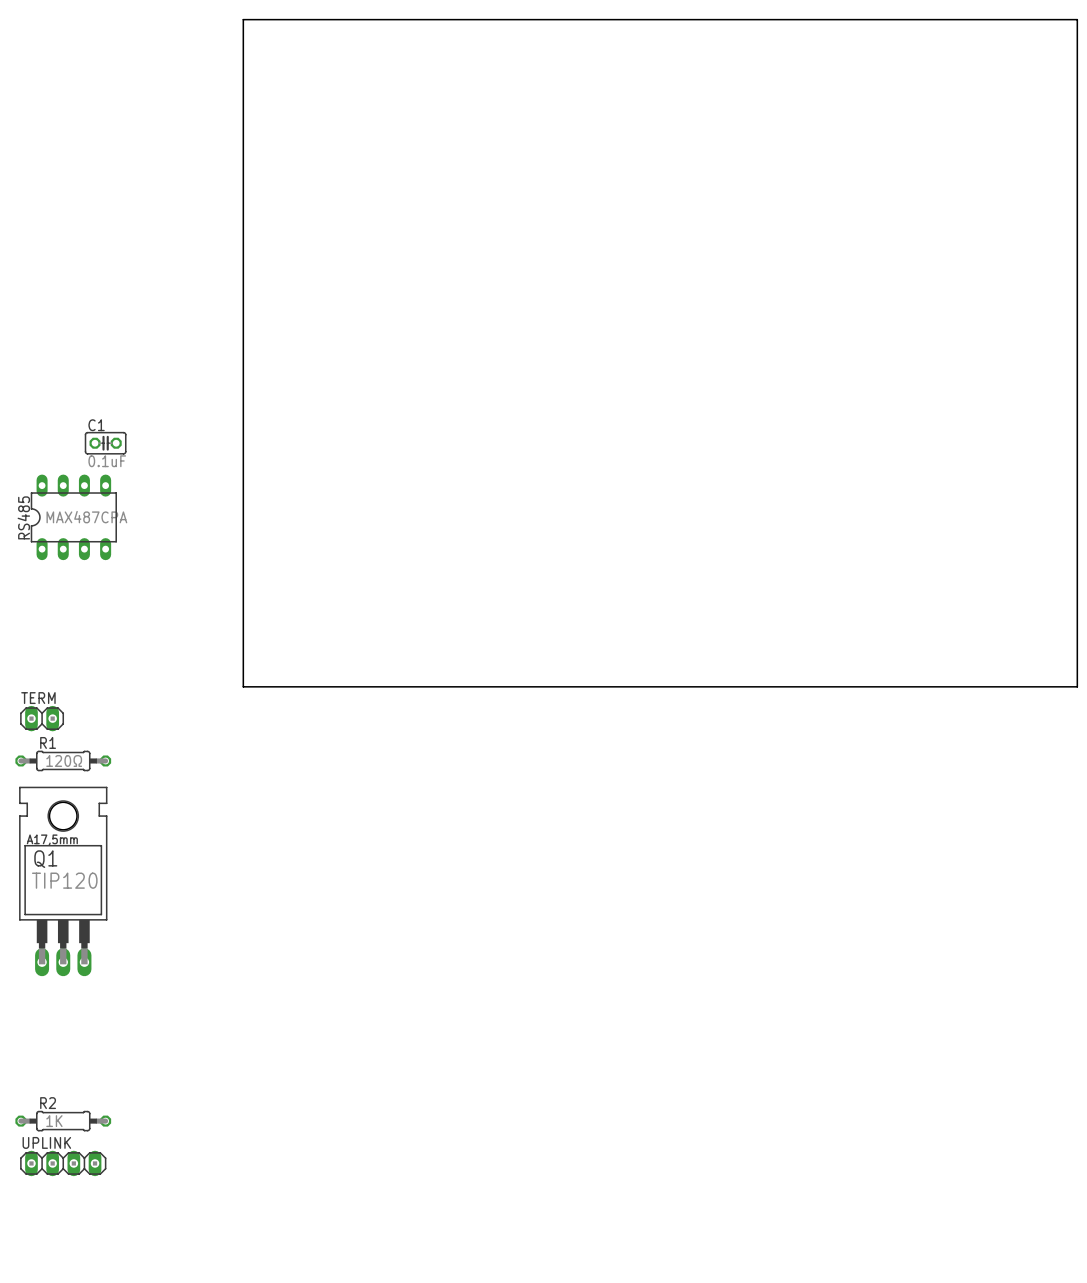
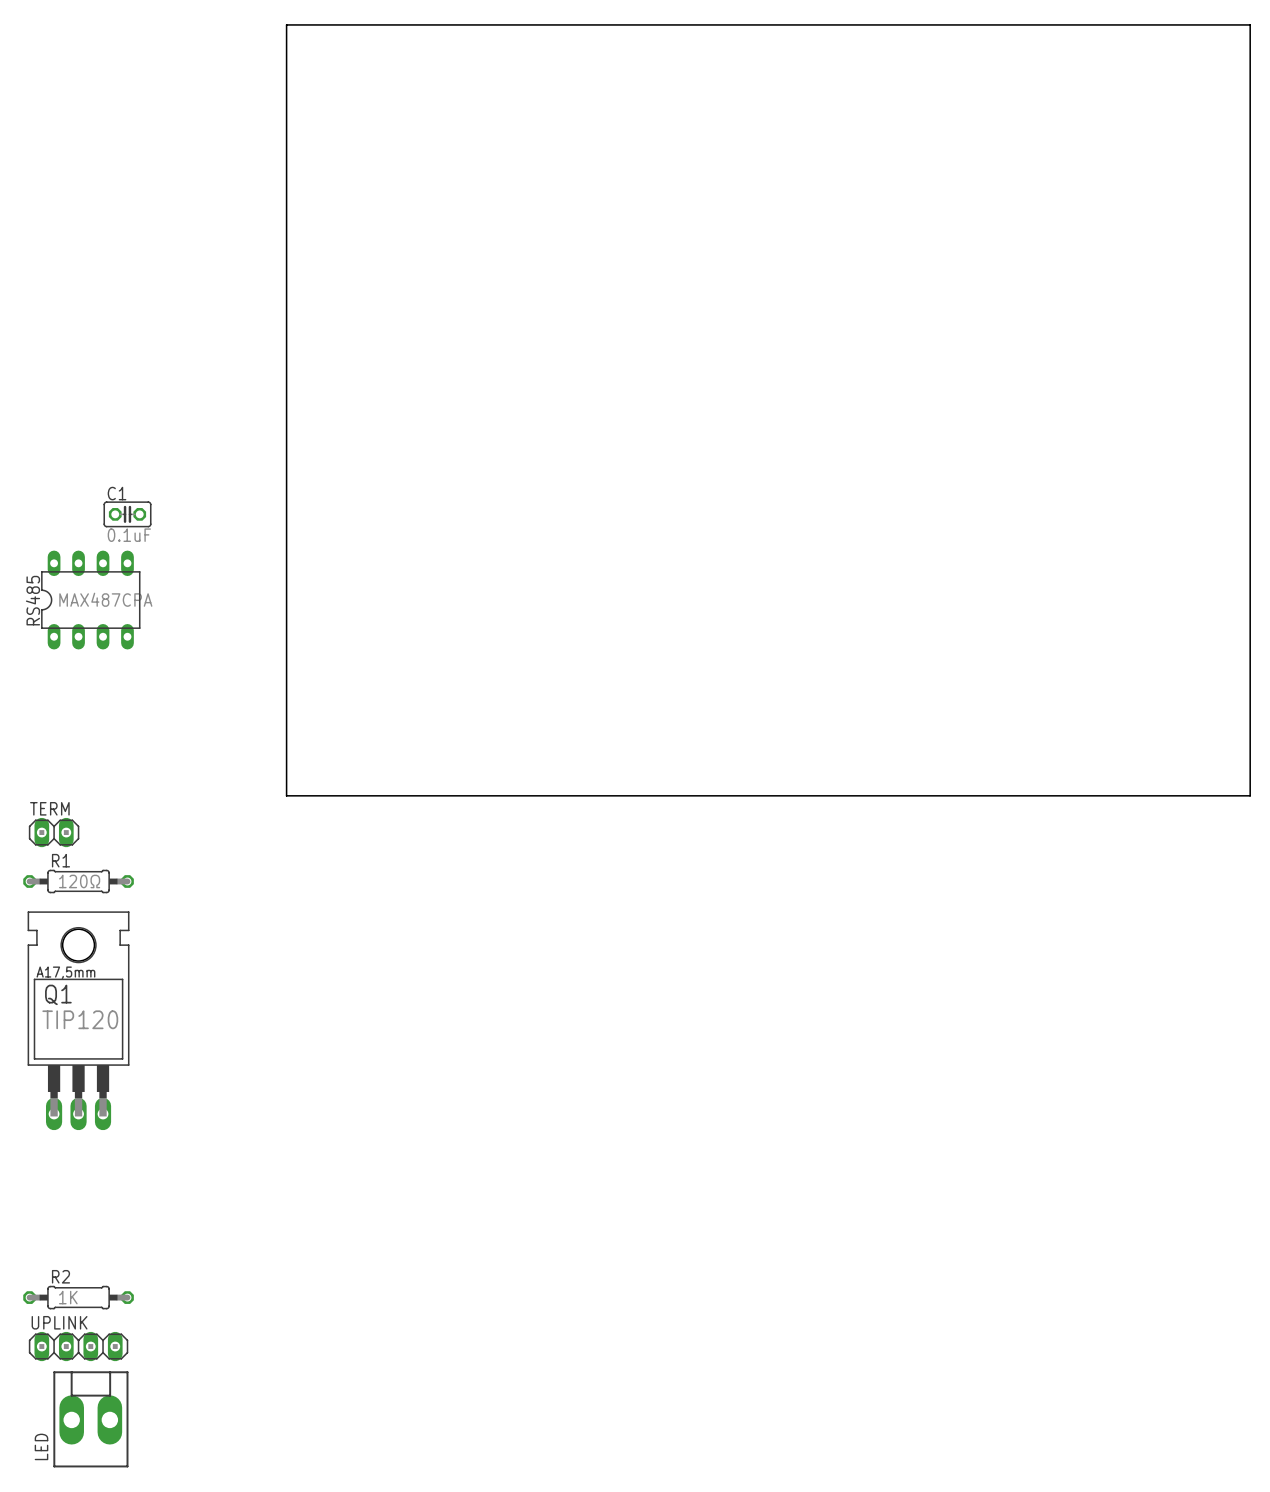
LED: none -> (90, 1419)

